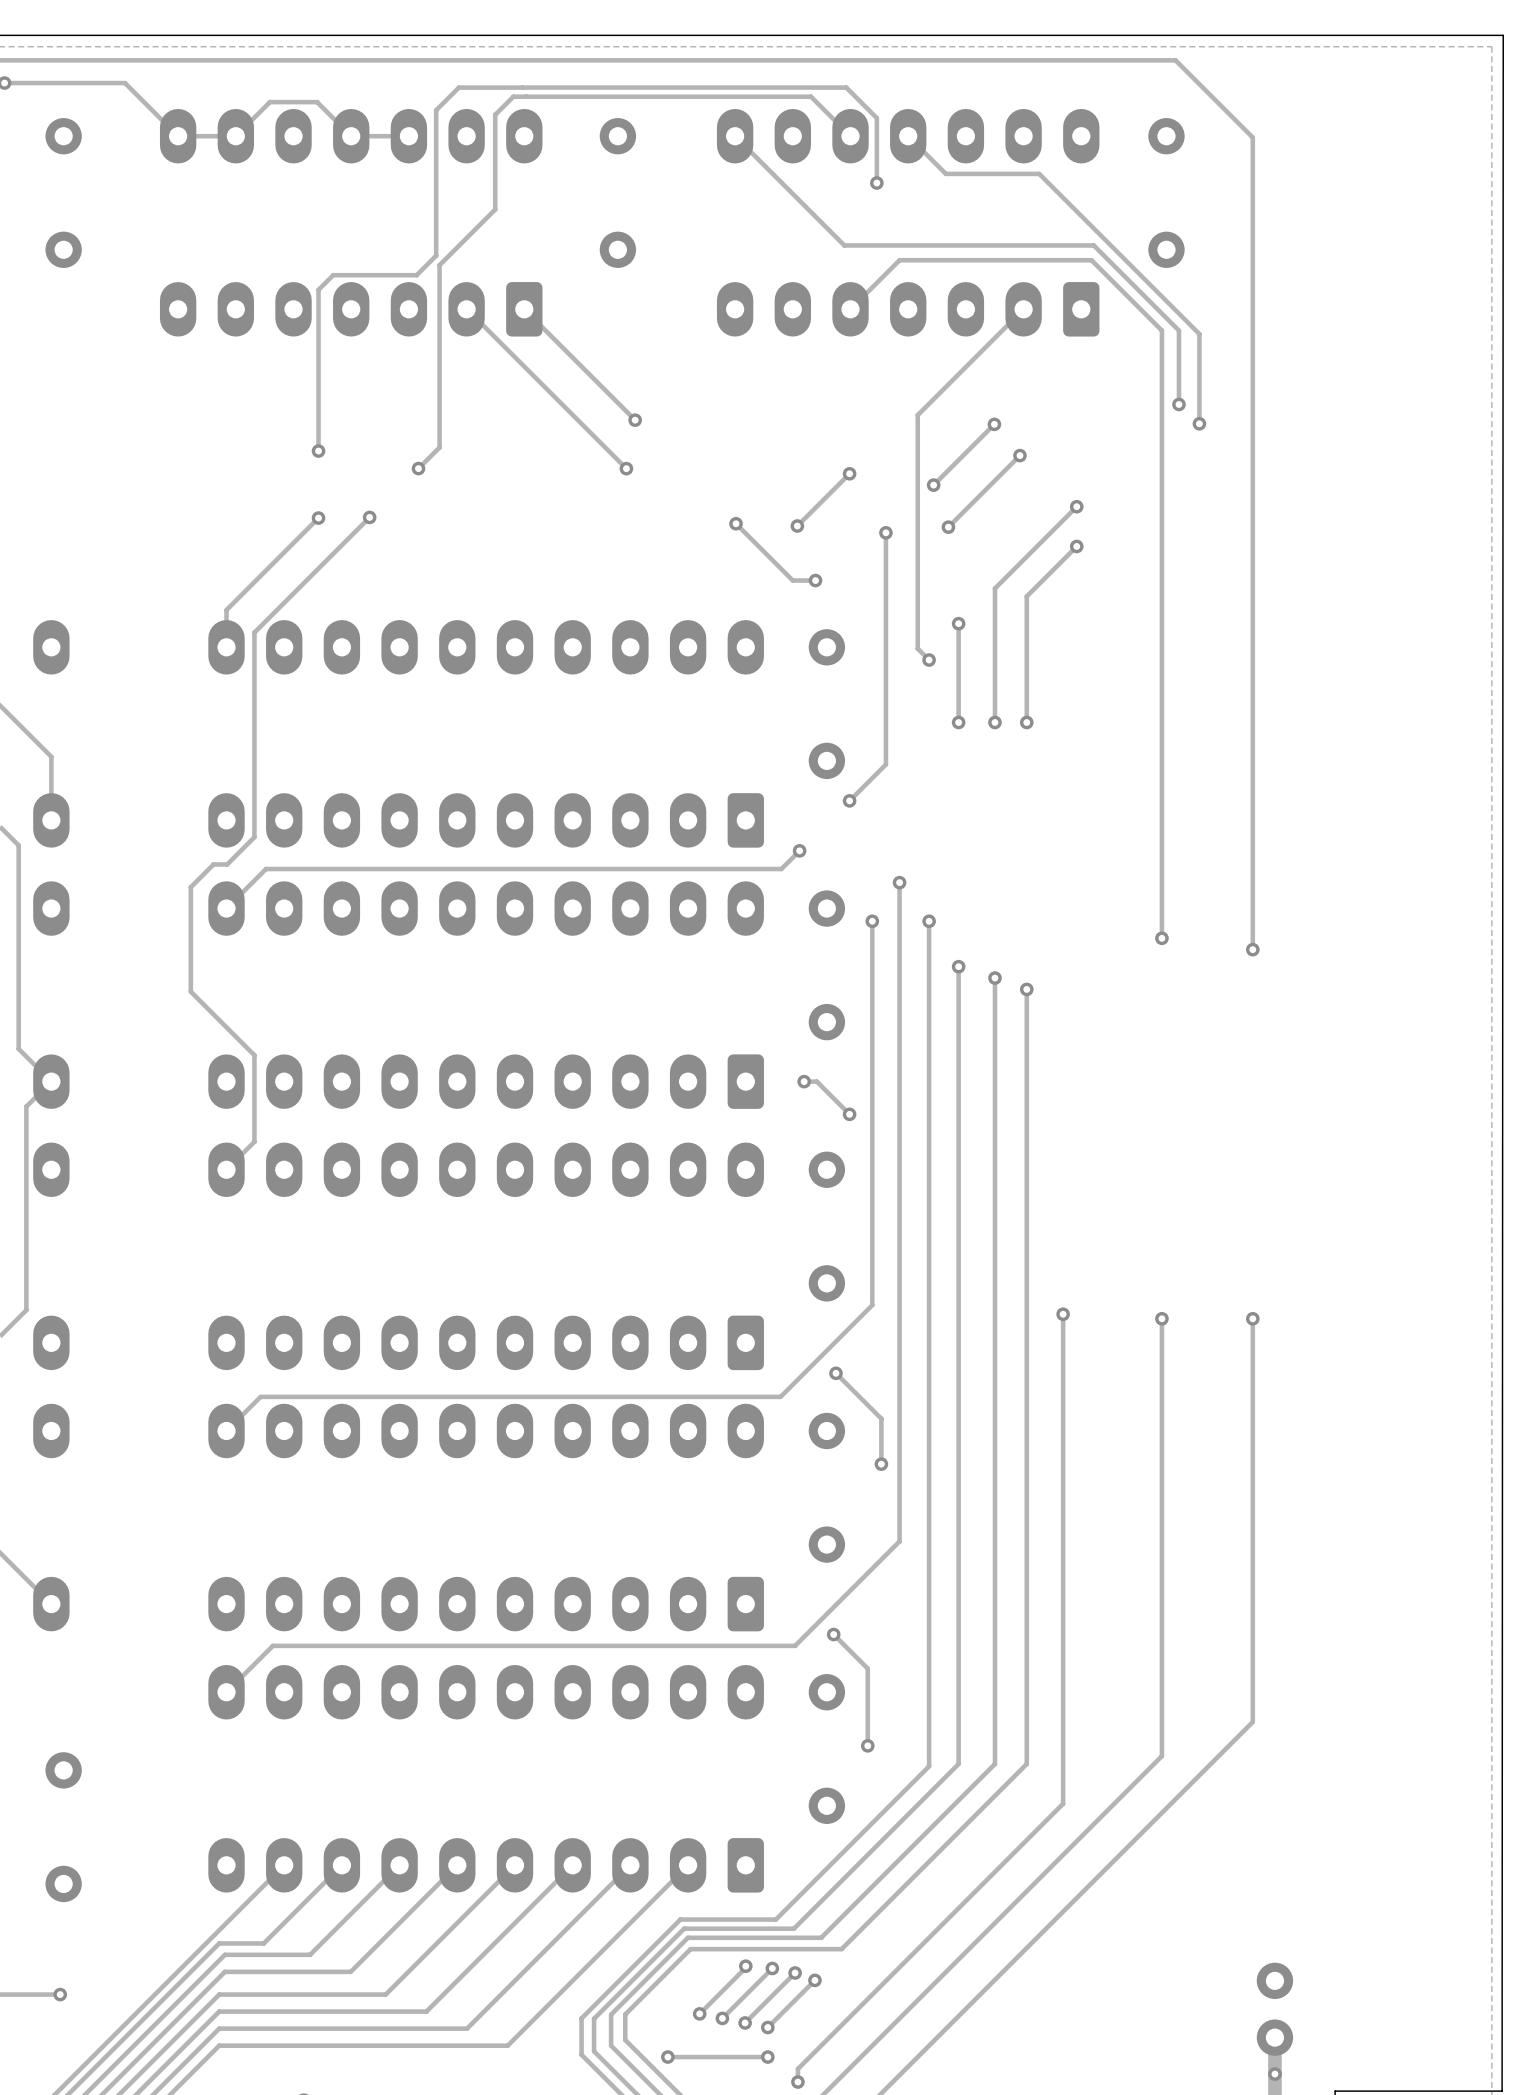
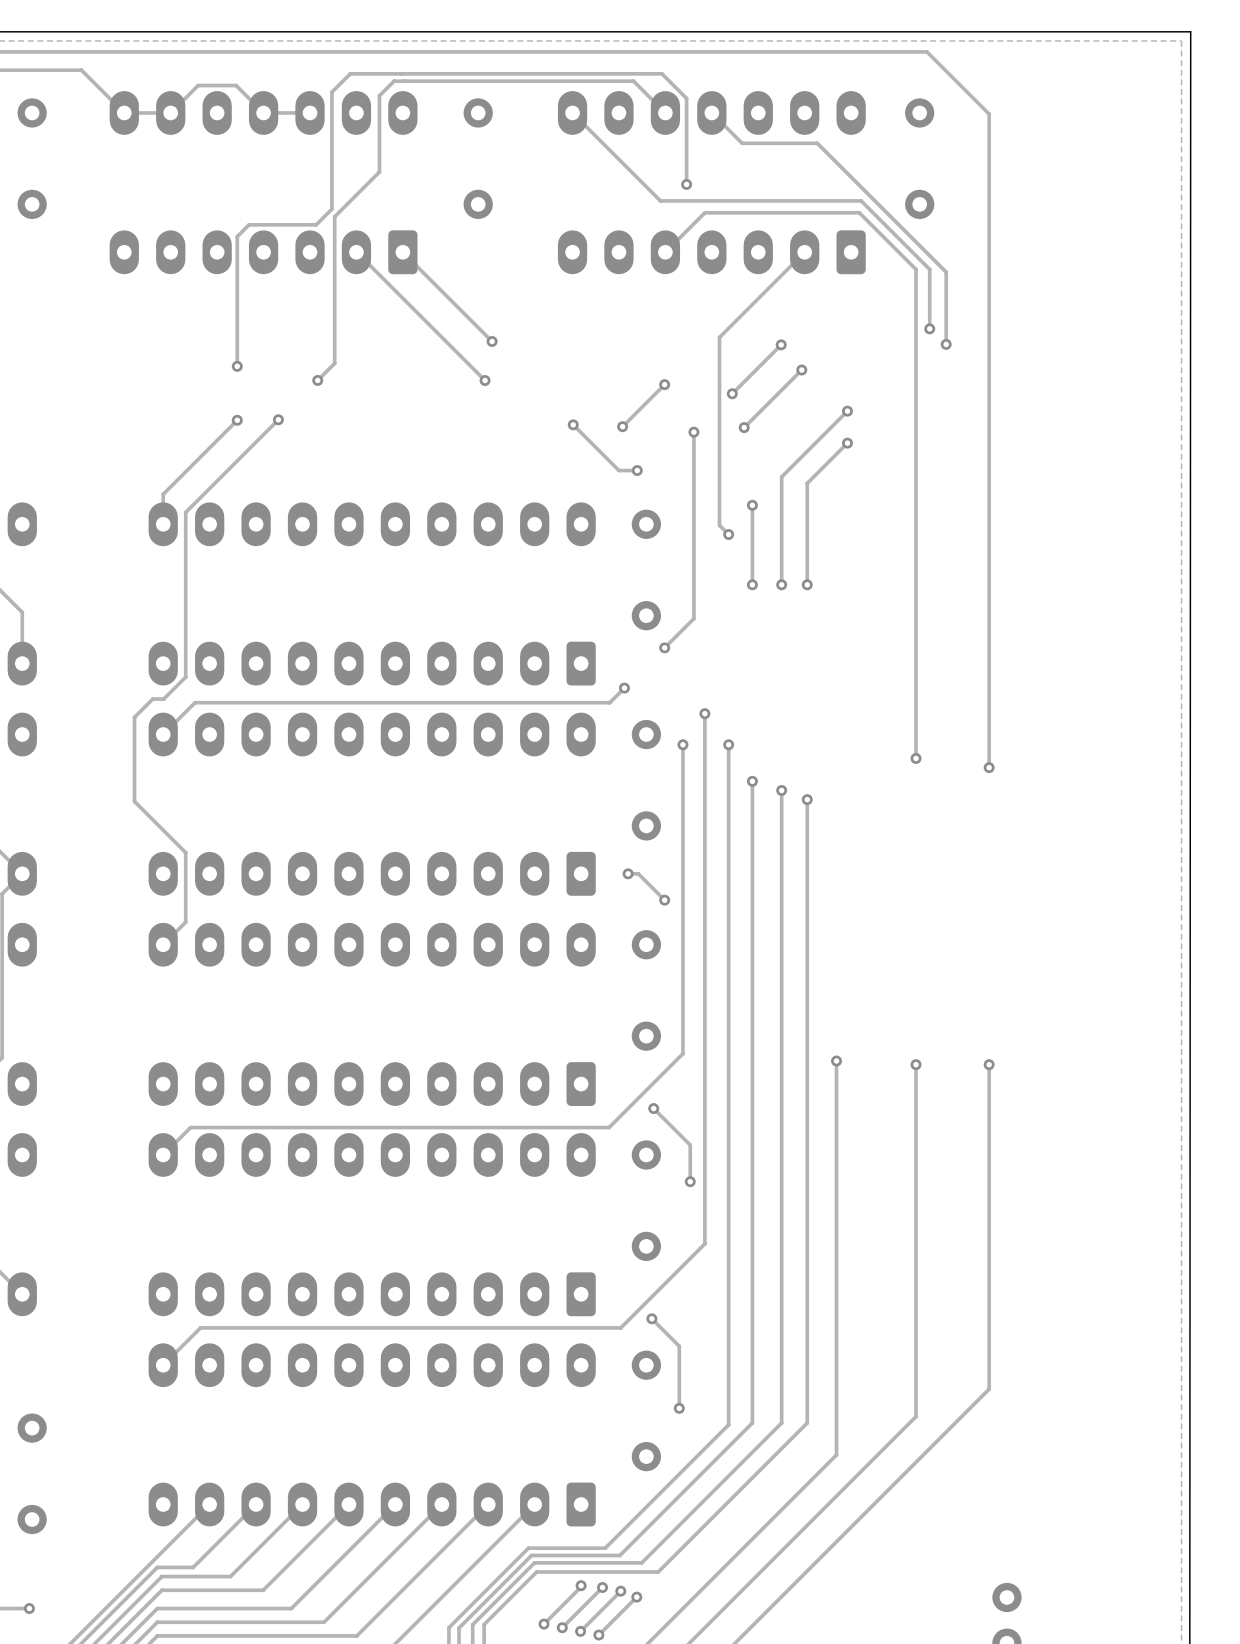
track: none -> (686, 150) (686, 184)
via position: (876, 183) -> (686, 184)

